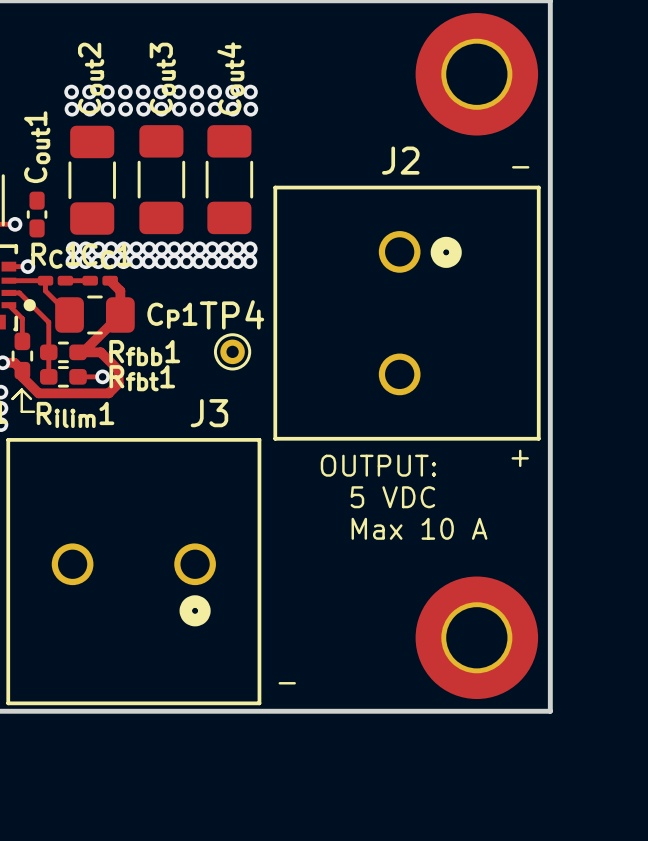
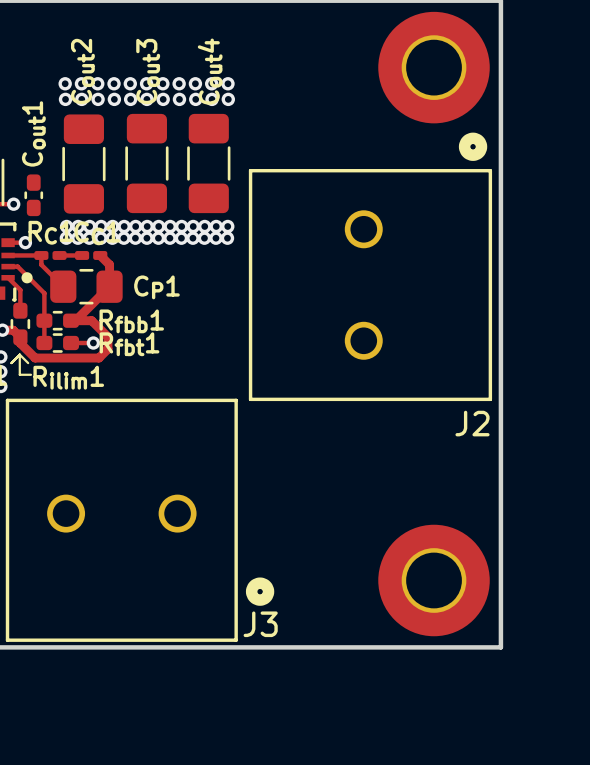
J2 name position: J2 (400, 160) -> J2 (472, 423)
text: - (520, 167) -> none
J2 footprint: [273, 185, 541, 441] -> [248, 132, 493, 402]
TP4: (232, 351) -> none
J3 name position: J3 (209, 413) -> J3 (260, 624)
J3 footprint: [6, 438, 262, 706] -> [5, 398, 275, 642]
text: + (520, 458) -> none
text: OUTPUT: (378, 465) -> none
text: 5 VDC (392, 497) -> none
text: Max 10 A (419, 528) -> none
text: - (287, 683) -> none

